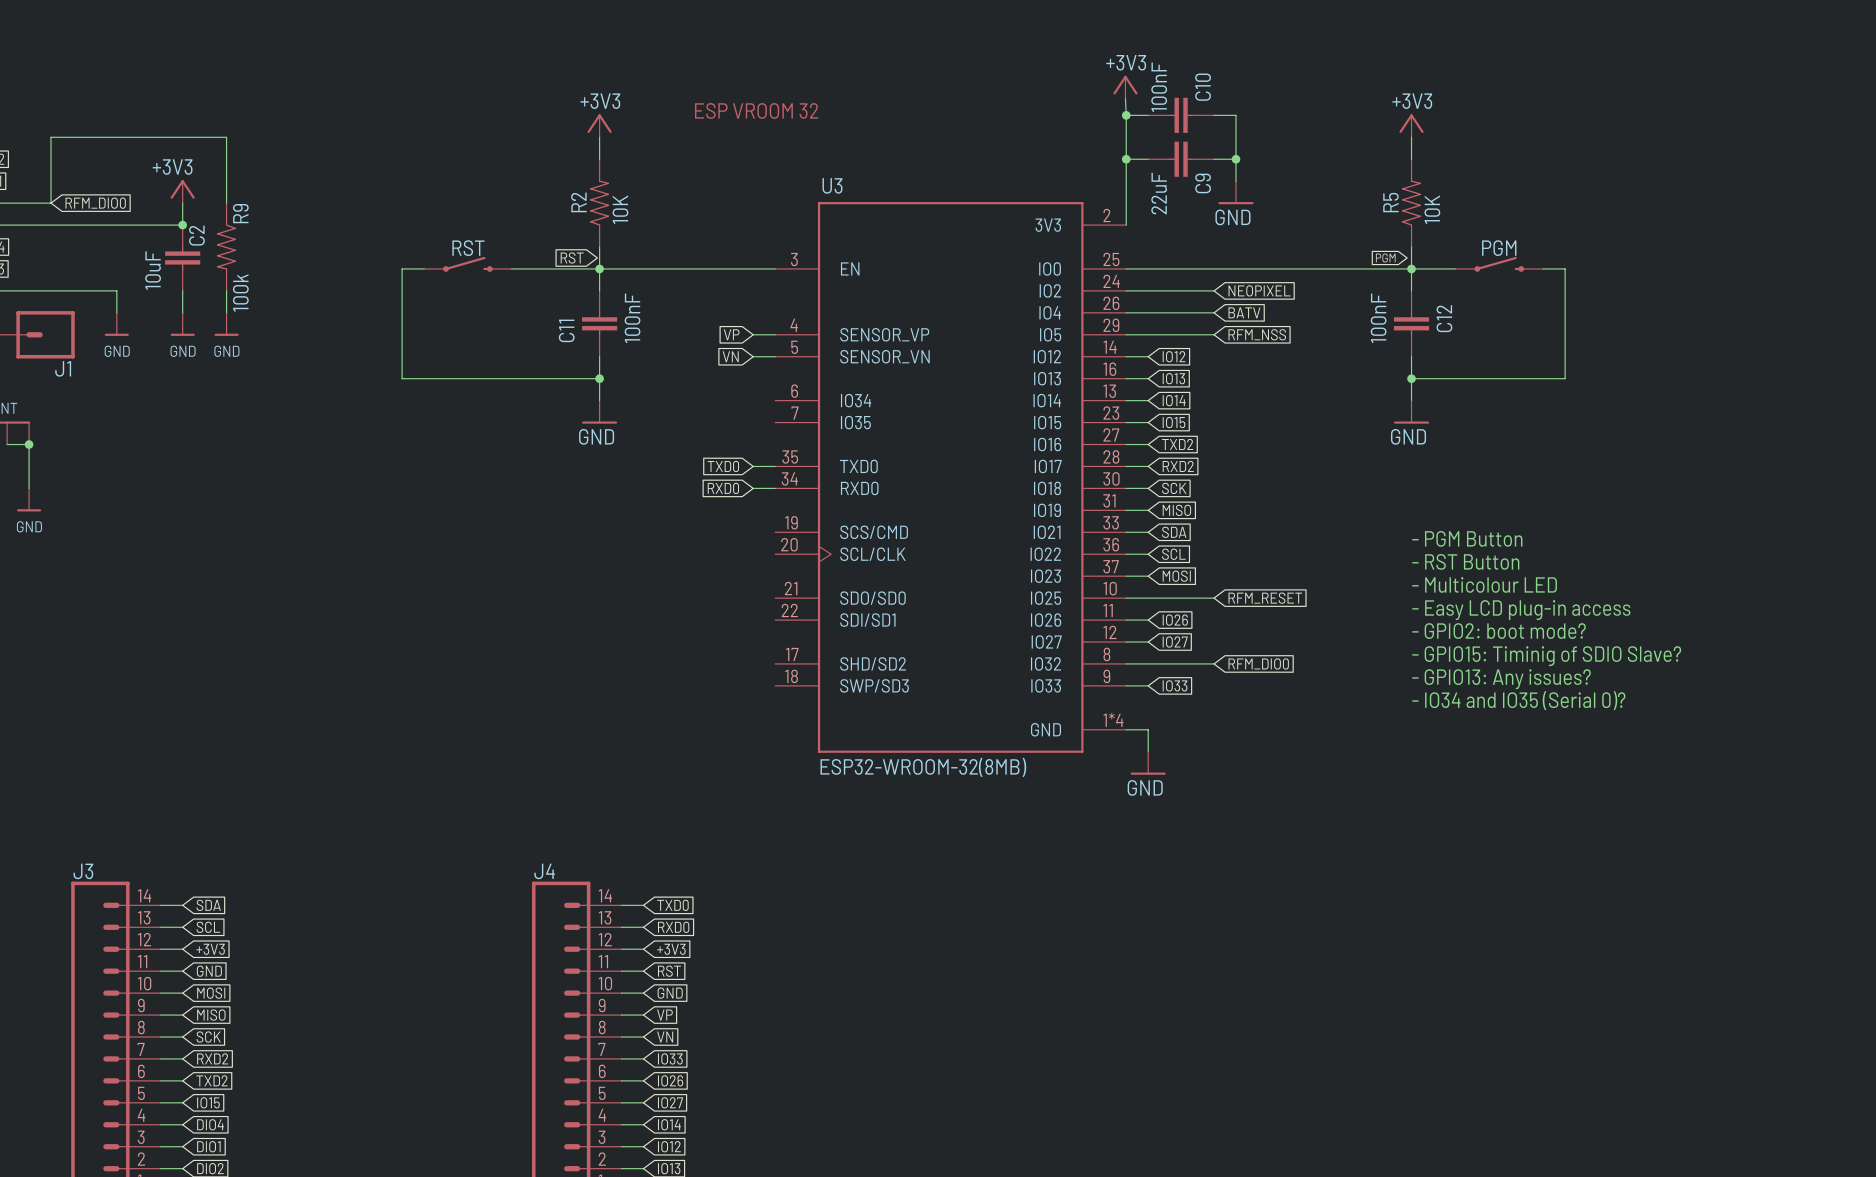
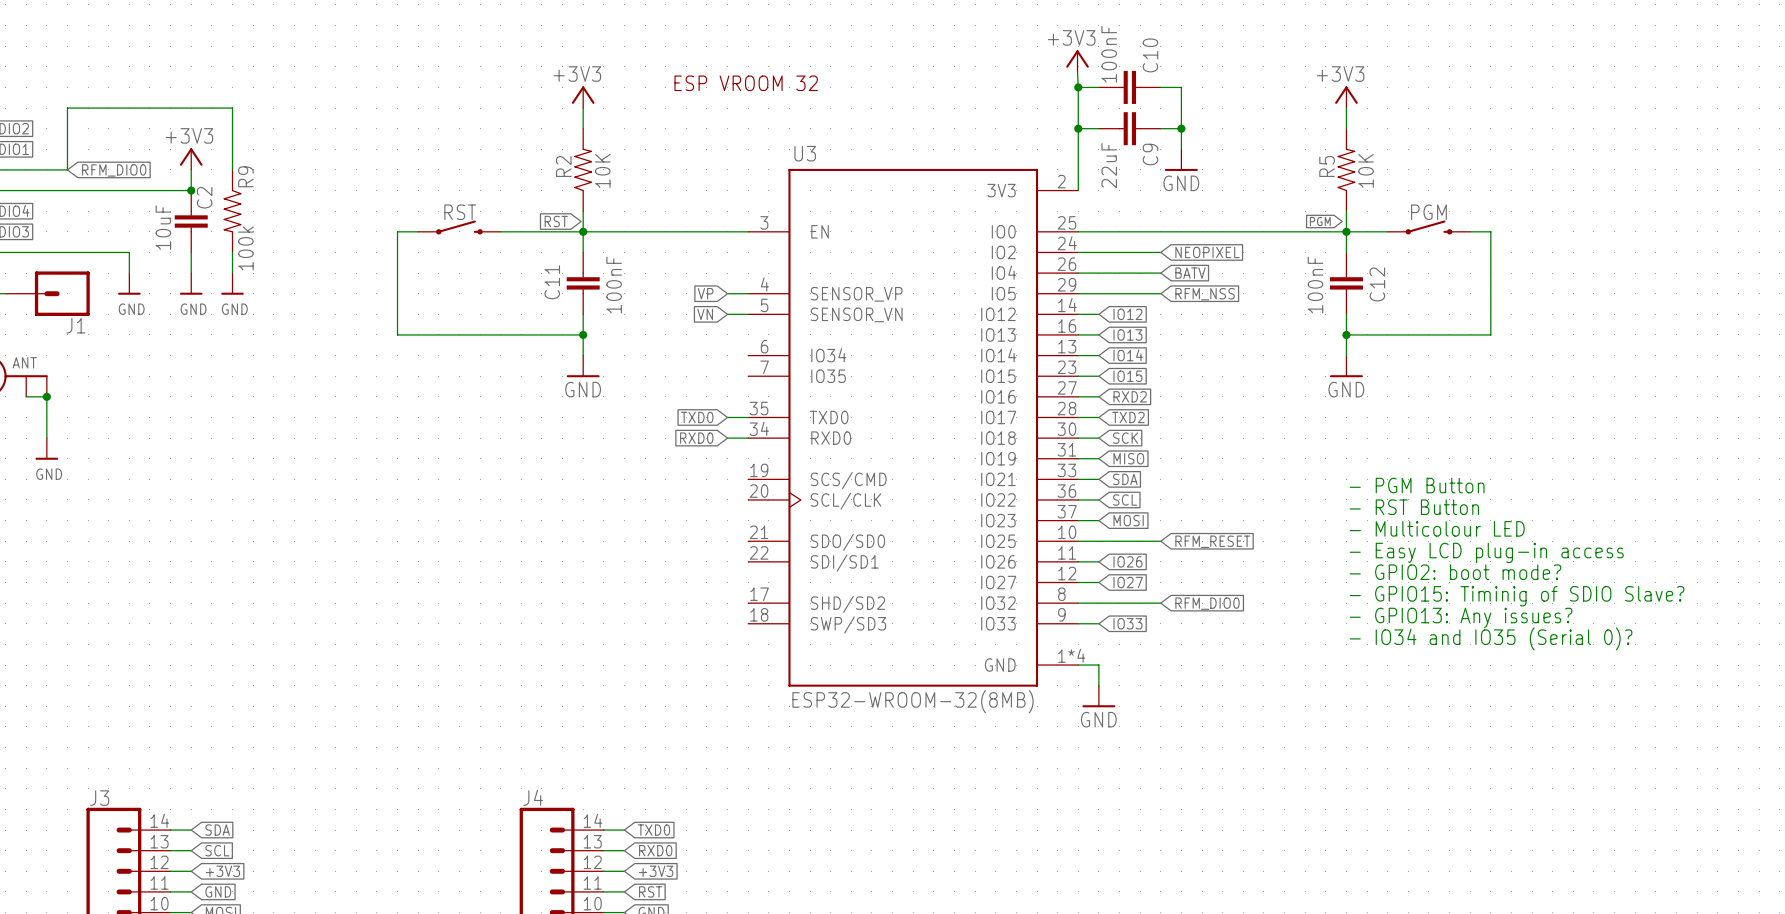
global label: TXD2 (1177, 444) -> RXD2 (1130, 396)
global label: RXD2 (1178, 466) -> TXD2 (1128, 417)

